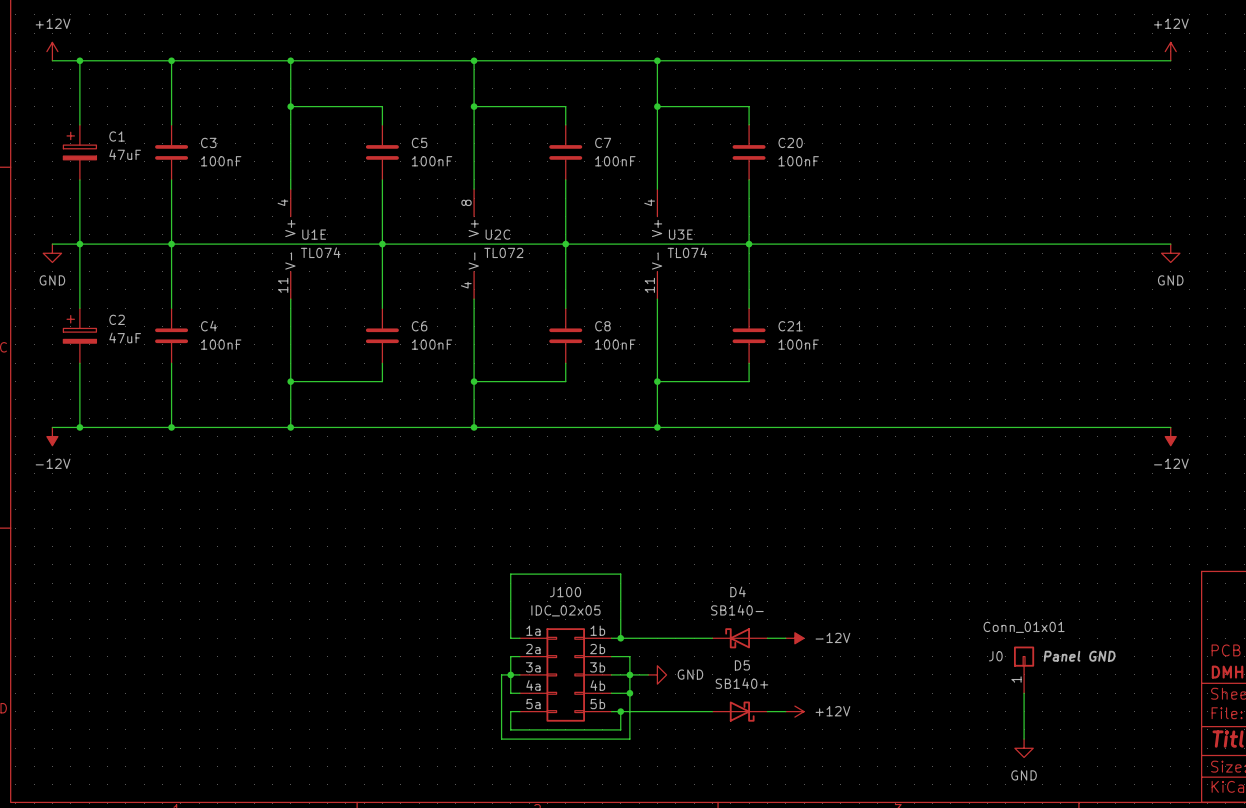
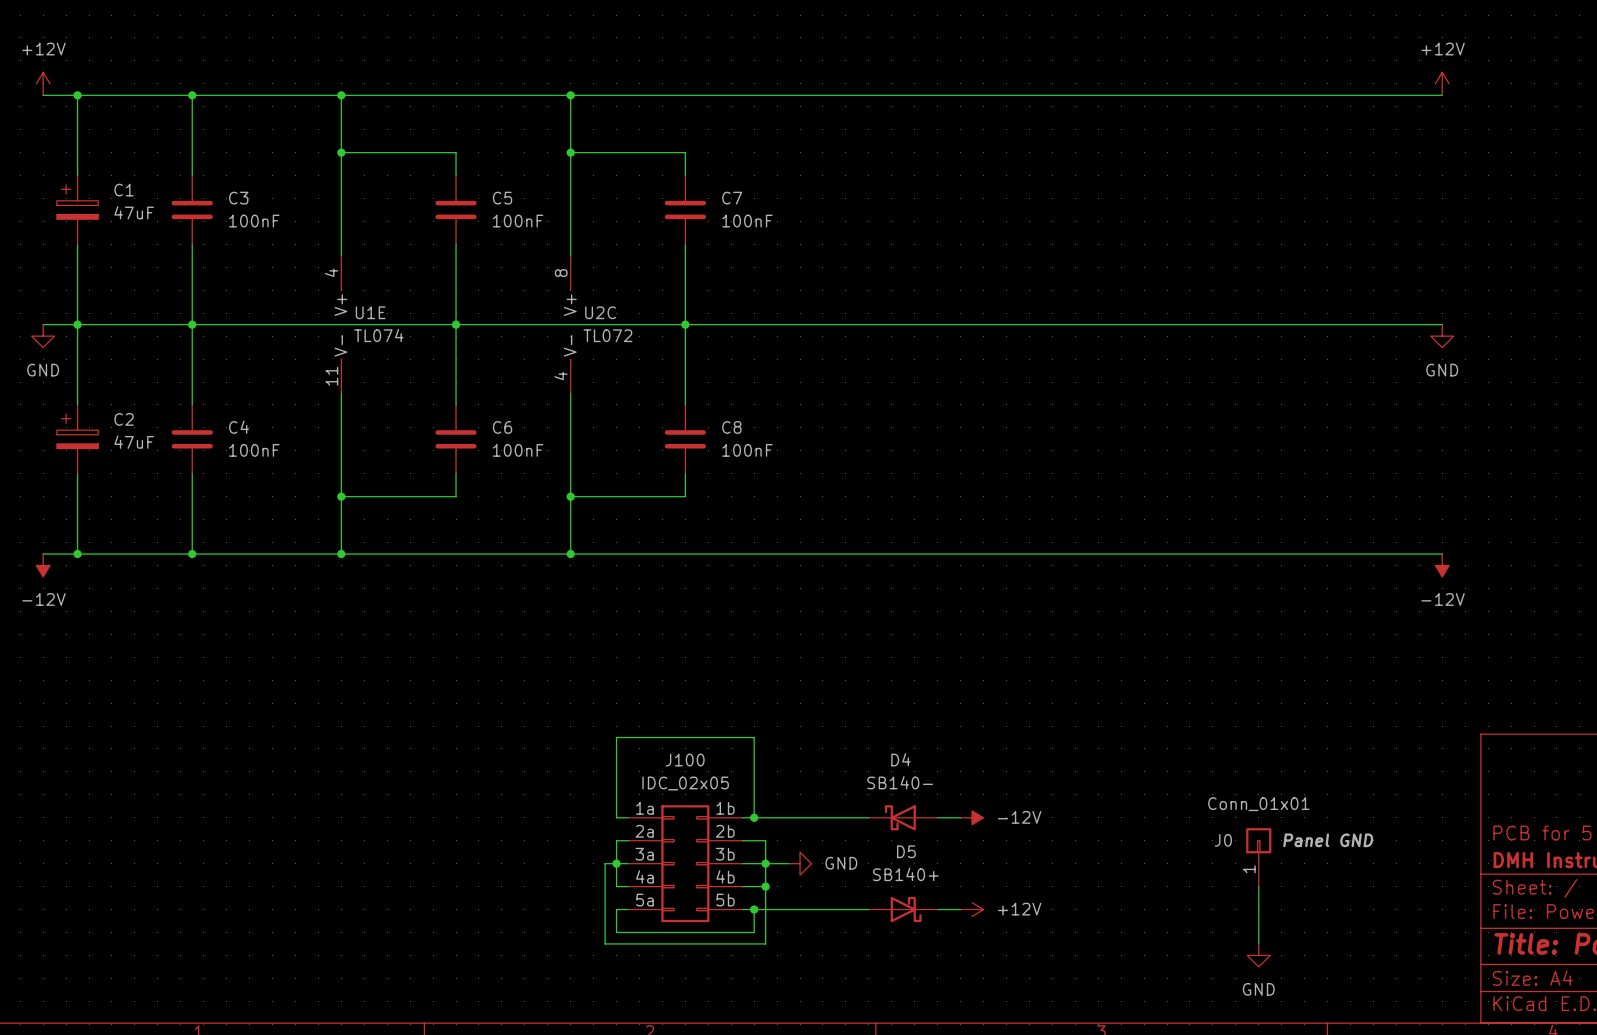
wire: (657, 60) (657, 189) -> none
junction: (657, 60) -> none
wire: (657, 106) (749, 106) (749, 124) -> none
junction: (657, 106) -> none
C20: 100nF (749, 152) -> none
wire: (749, 179) (749, 308) -> none
U3E: TL074 (657, 244) -> none
junction: (749, 244) -> none
wire: (657, 299) (657, 427) -> none
C21: 100nF (749, 335) -> none
wire: (749, 363) (749, 381) (657, 381) -> none
junction: (657, 381) -> none
junction: (657, 427) -> none

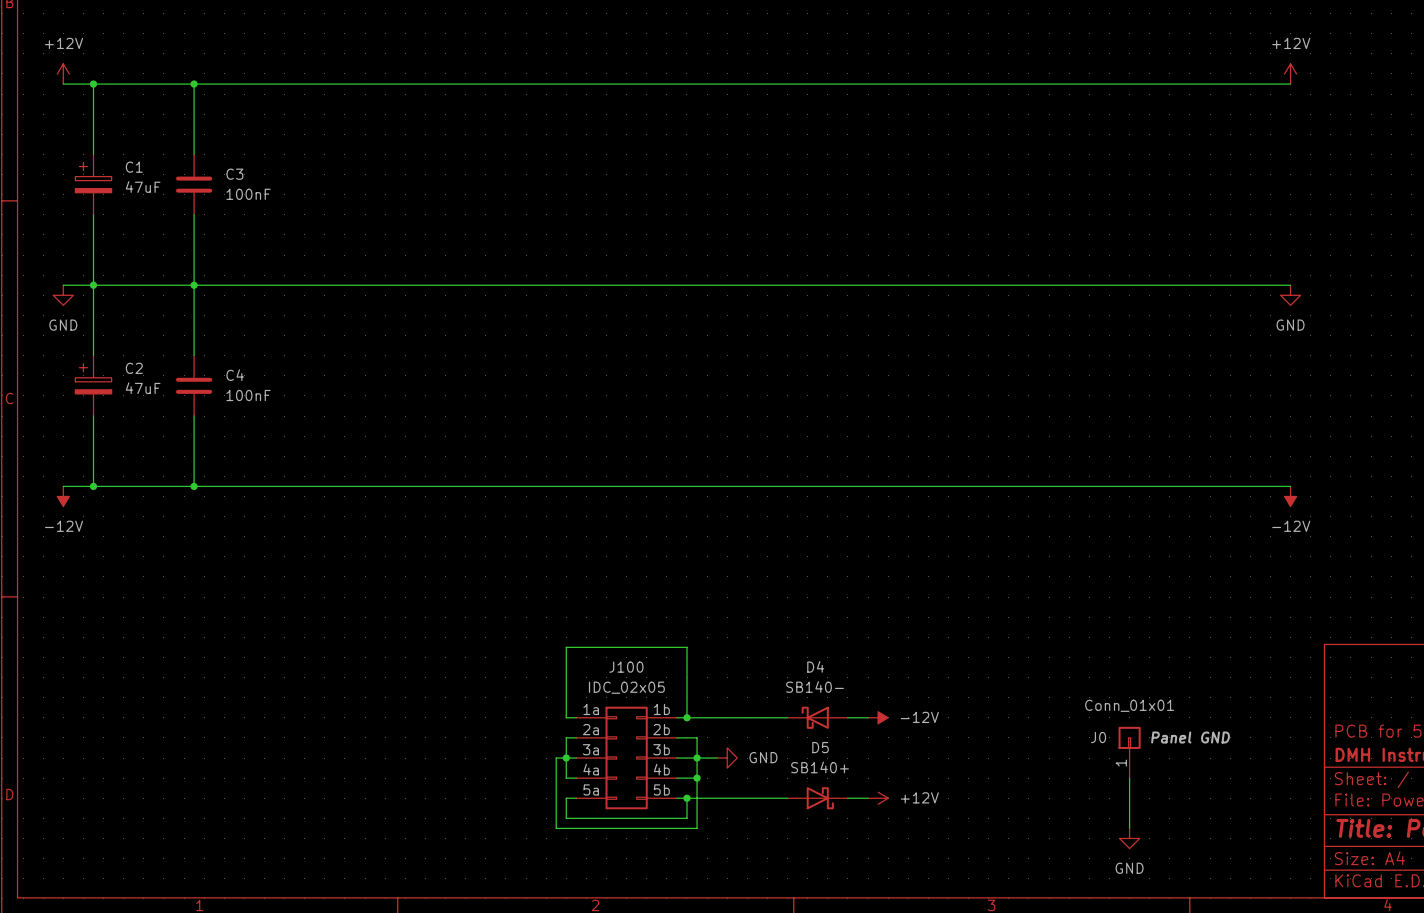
wire: (341, 95) (341, 255) -> none
junction: (341, 95) -> none
wire: (570, 95) (570, 255) -> none
junction: (570, 95) -> none
wire: (341, 152) (456, 152) (456, 175) -> none
junction: (341, 152) -> none
wire: (570, 152) (685, 152) (685, 175) -> none
junction: (570, 152) -> none
C5: 100nF (456, 209) -> none
C7: 100nF (685, 209) -> none
wire: (456, 244) (456, 404) -> none
wire: (685, 244) (685, 404) -> none
U1E: TL074 (341, 324) -> none
junction: (456, 324) -> none
U2C: TL072 (570, 324) -> none
junction: (685, 324) -> none
wire: (341, 393) (341, 554) -> none
wire: (570, 393) (570, 554) -> none
C6: 100nF (456, 439) -> none
C8: 100nF (685, 439) -> none
wire: (456, 473) (456, 496) (341, 496) -> none
wire: (685, 473) (685, 496) (570, 496) -> none
junction: (341, 496) -> none
junction: (570, 496) -> none
junction: (341, 554) -> none
junction: (570, 554) -> none

